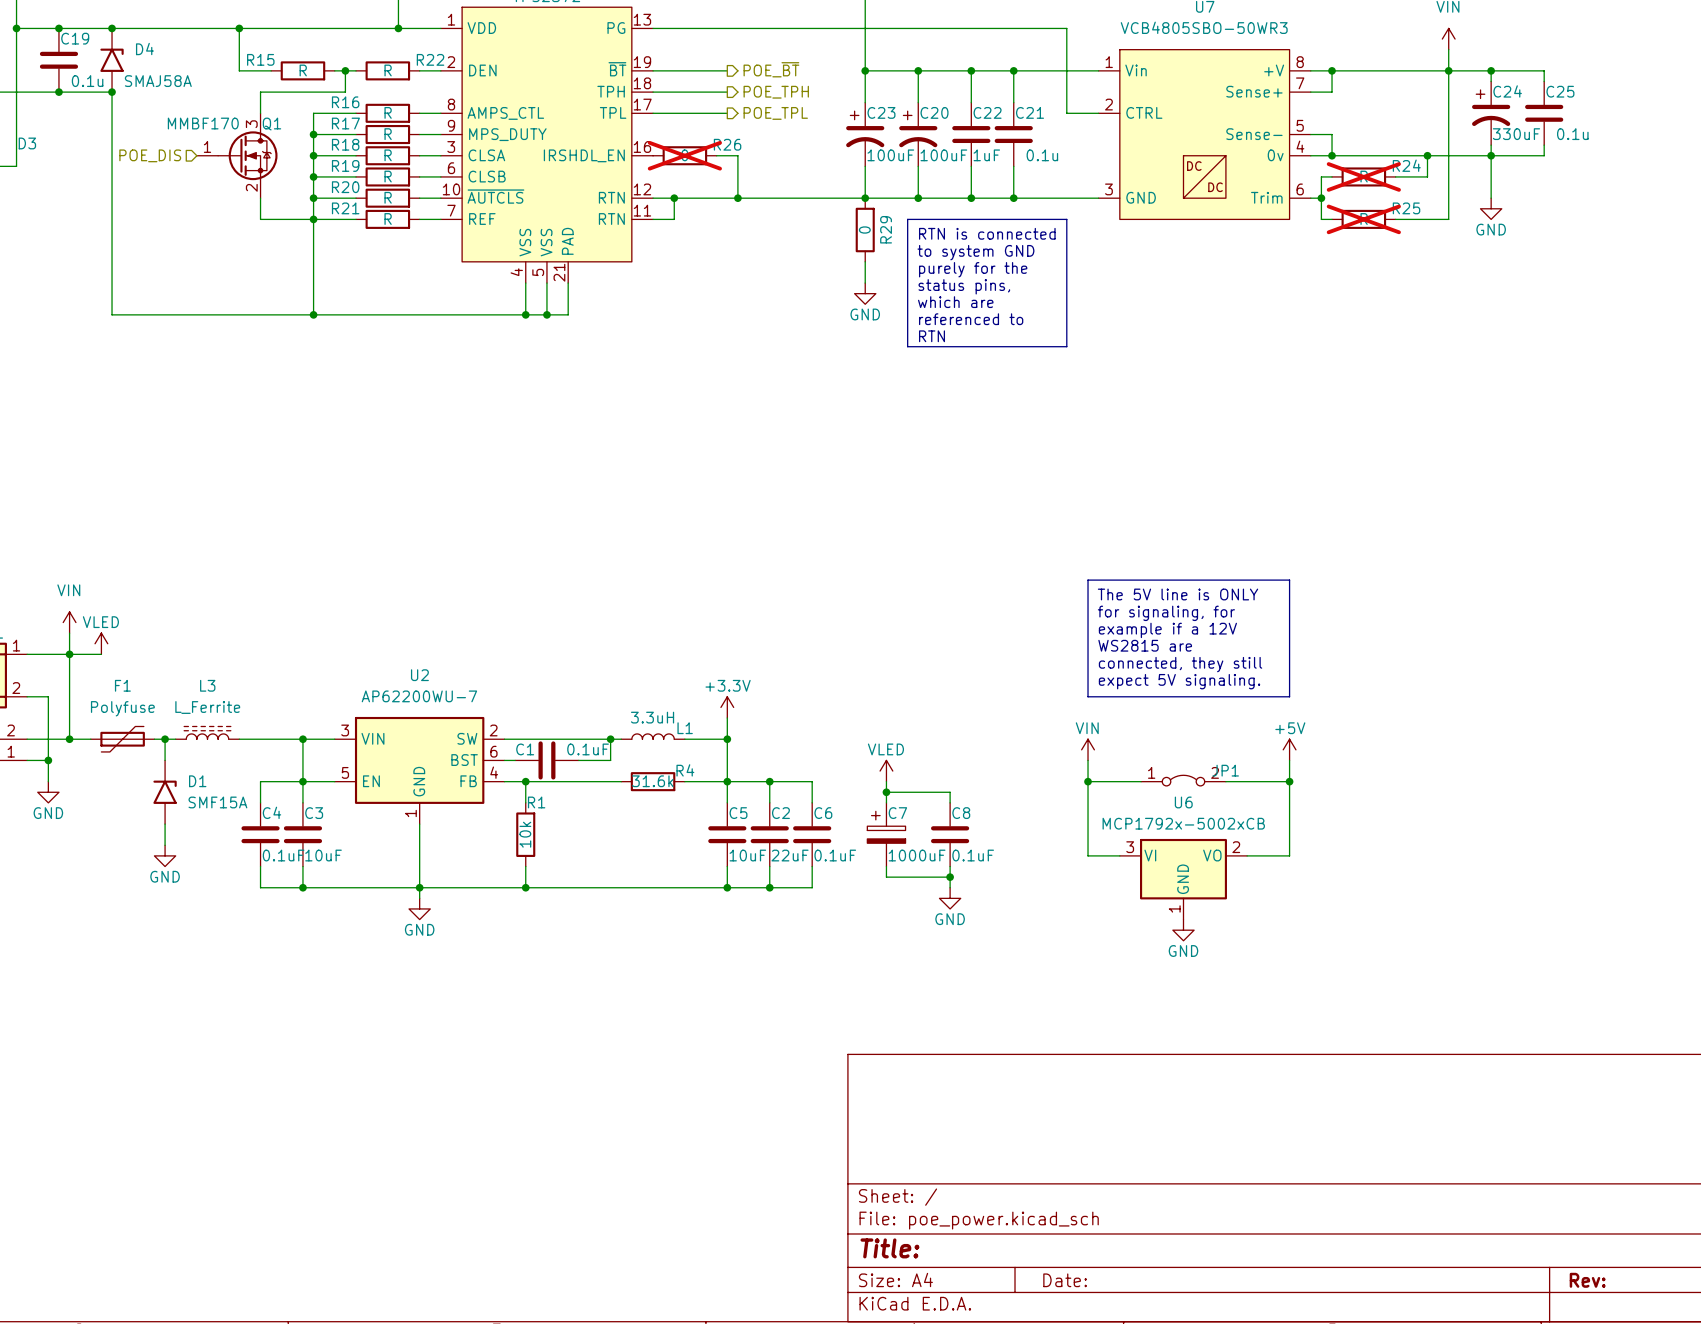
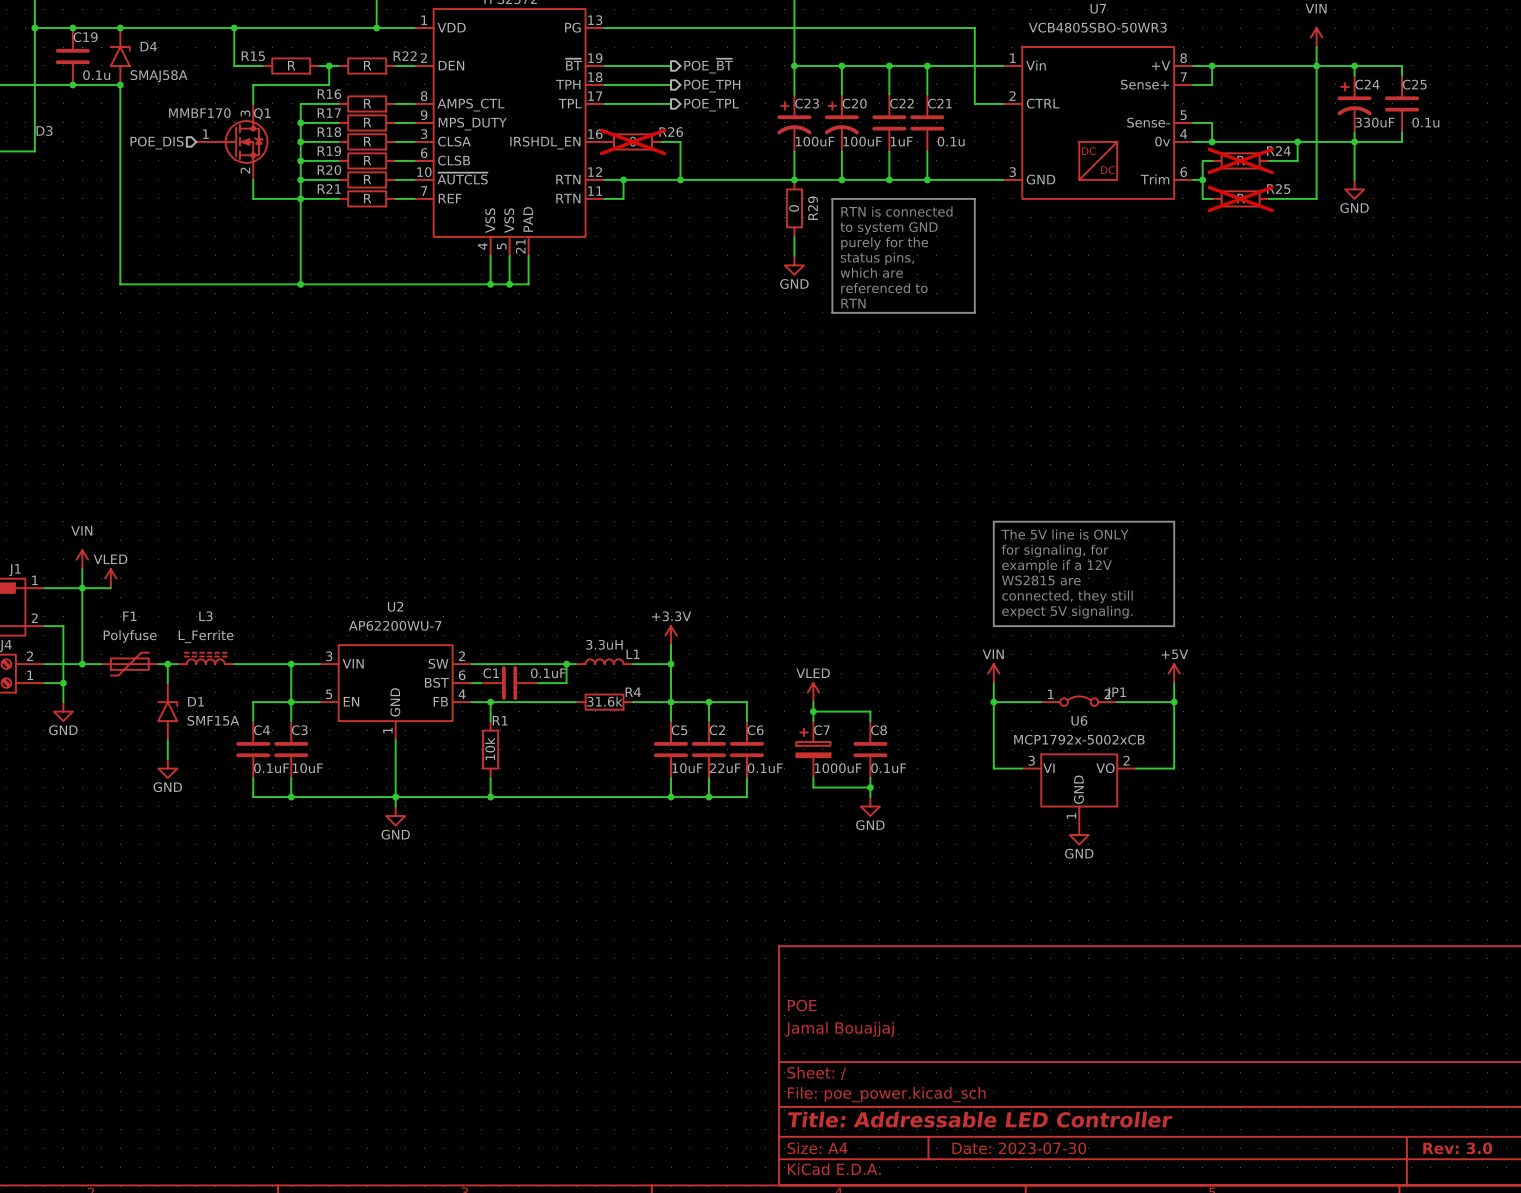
title block: none -> POE (802, 1005)
title block: none -> Jamal Bouajjaj (839, 1029)
title block: Title: (889, 1248) -> Title: Addressable LED Controller (980, 1119)
title block: Date: (1065, 1280) -> Date: 2023-07-30 (1019, 1148)
title block: Rev: (1587, 1280) -> Rev: 3.0 (1457, 1148)

